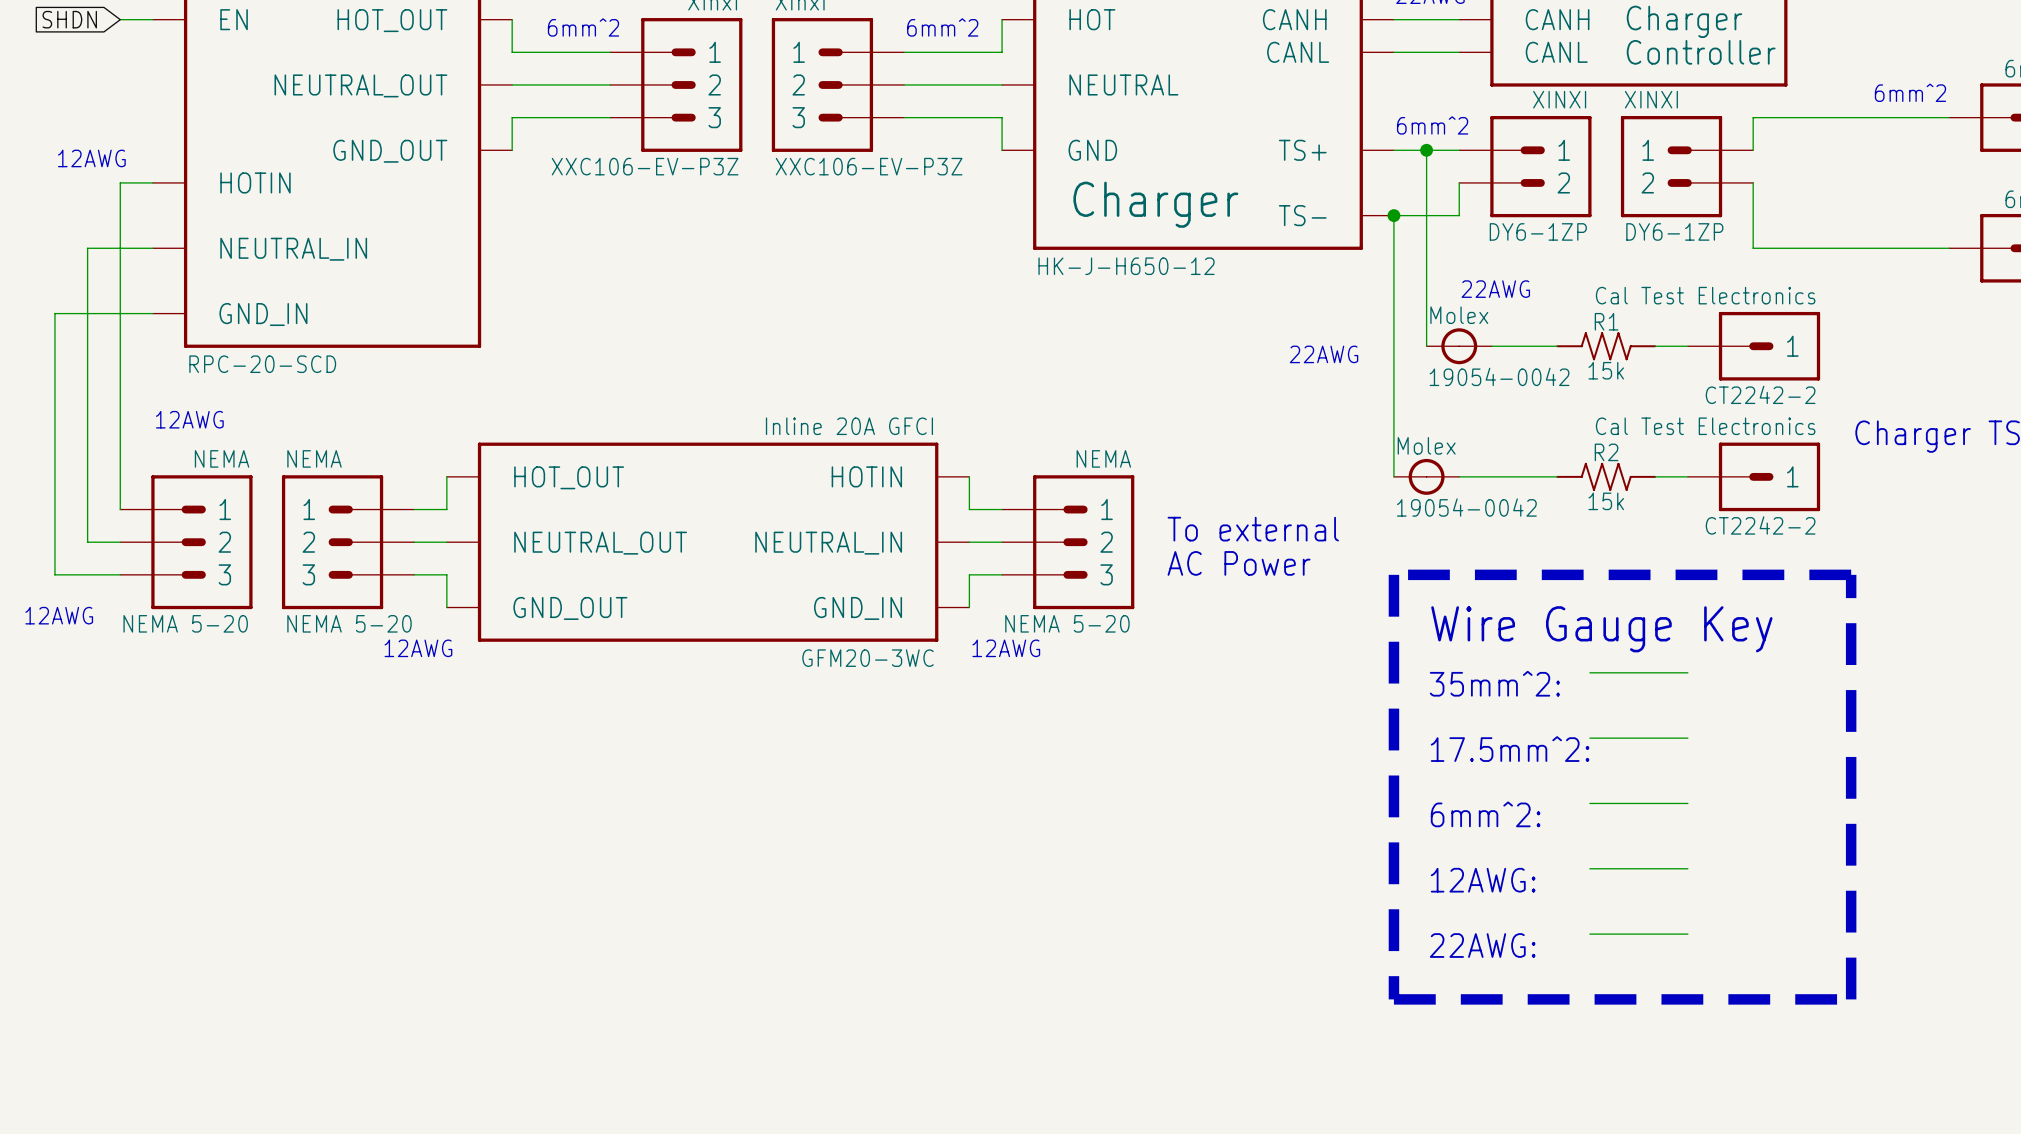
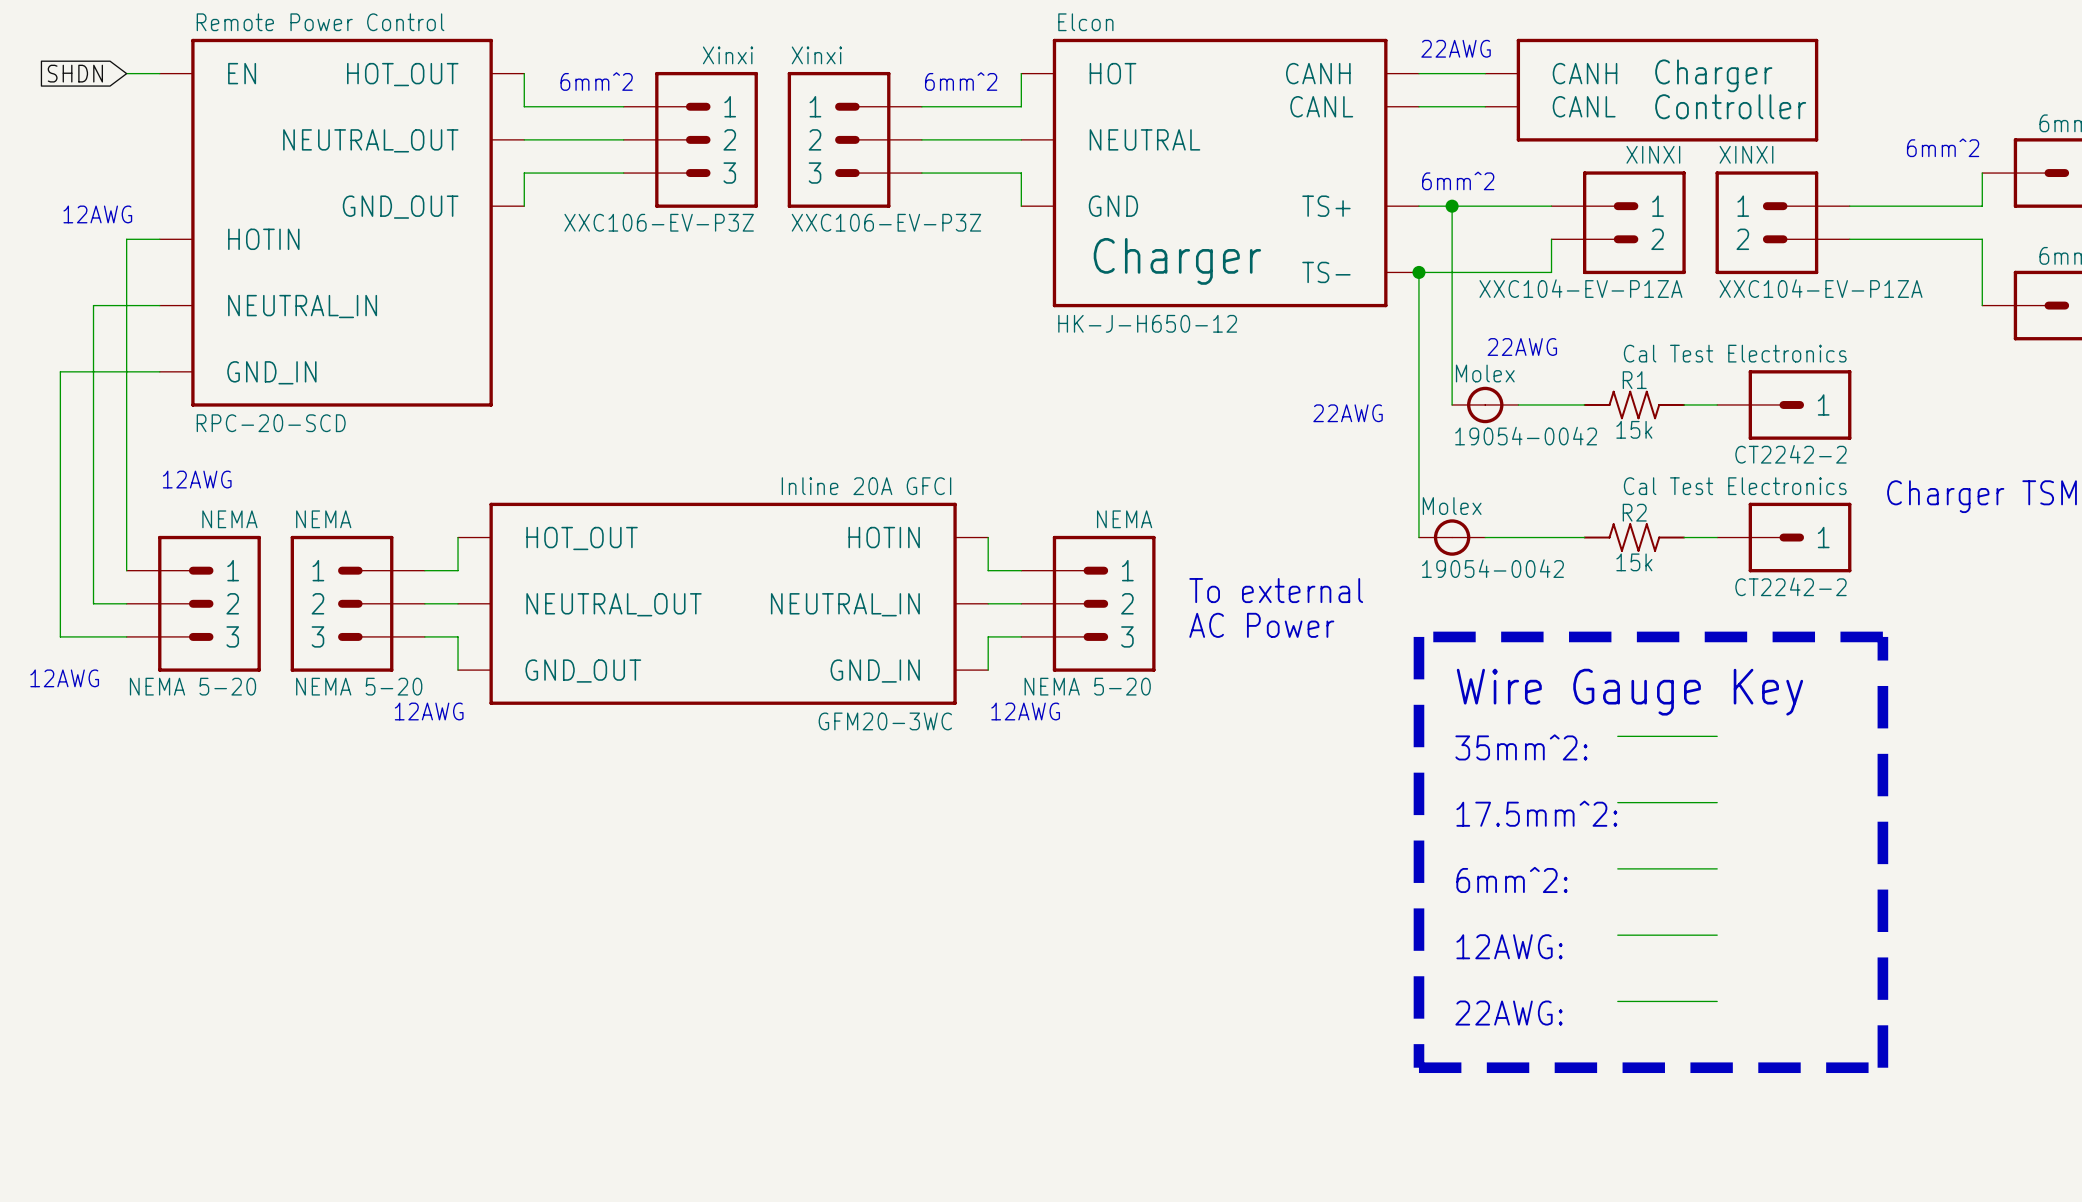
wire: (1949, 117) (1753, 117) (1753, 150) -> (1982, 173) (1982, 206) (1849, 206)
part: (1525, 166) -> none
part: none -> (1618, 222)
part: (1687, 166) -> none
part: none -> (1782, 222)
wire: (1459, 182) (1459, 215) -> (1551, 239) (1551, 272) (1485, 272)
wire: (1753, 182) (1753, 248) (1949, 248) -> (1849, 239) (1982, 239) (1982, 305)

